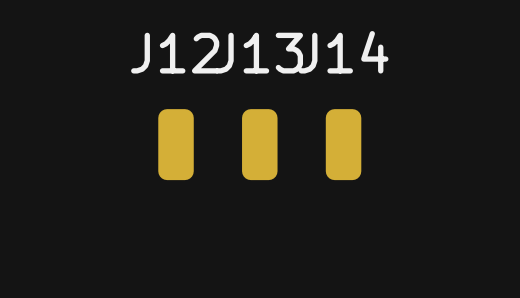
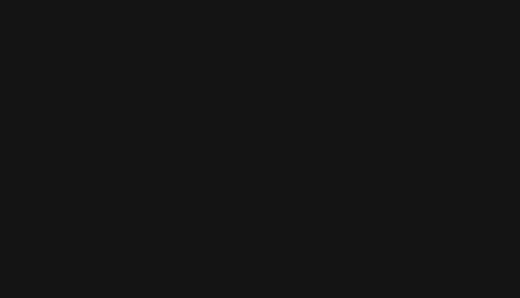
J12: (176, 144) -> none
J13: (259, 144) -> none
J14: (343, 144) -> none

